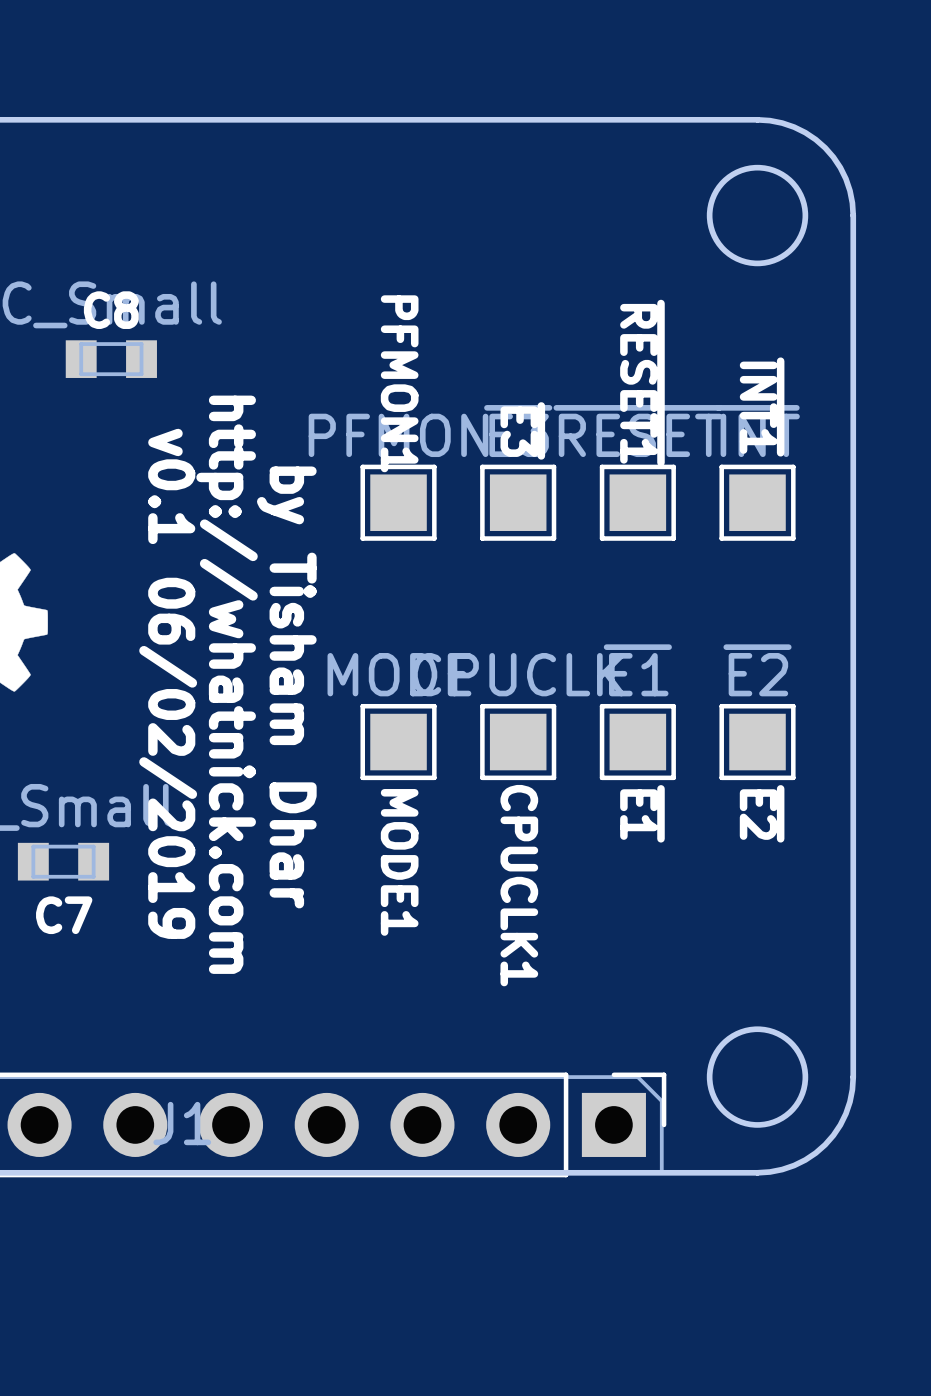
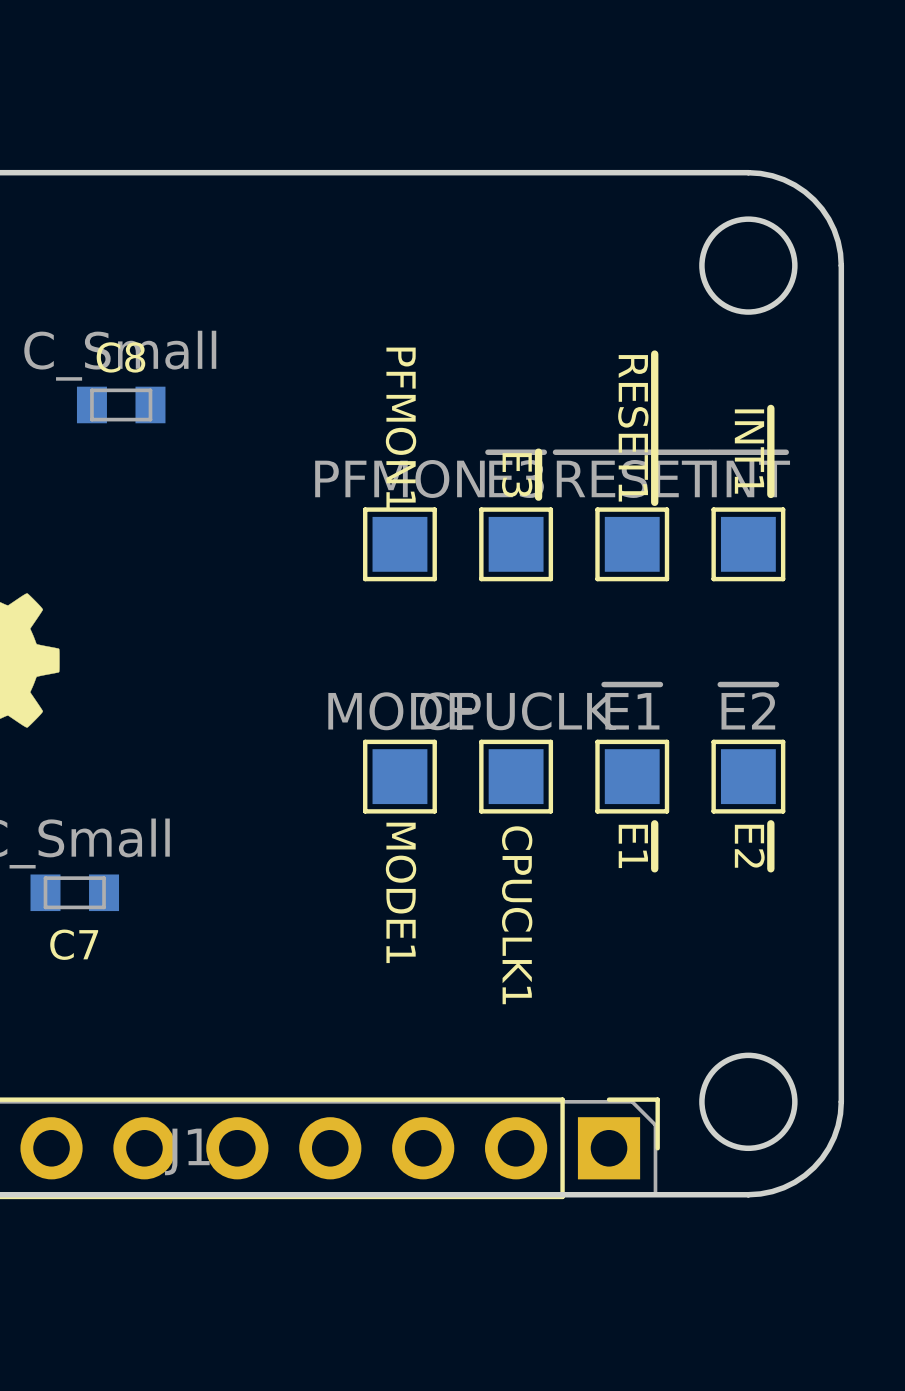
text: v0.1 06/02/2019 (168, 683) -> none
text: http://whatnick.com (227, 684) -> none
text: by Tisham Dhar (286, 687) -> none

